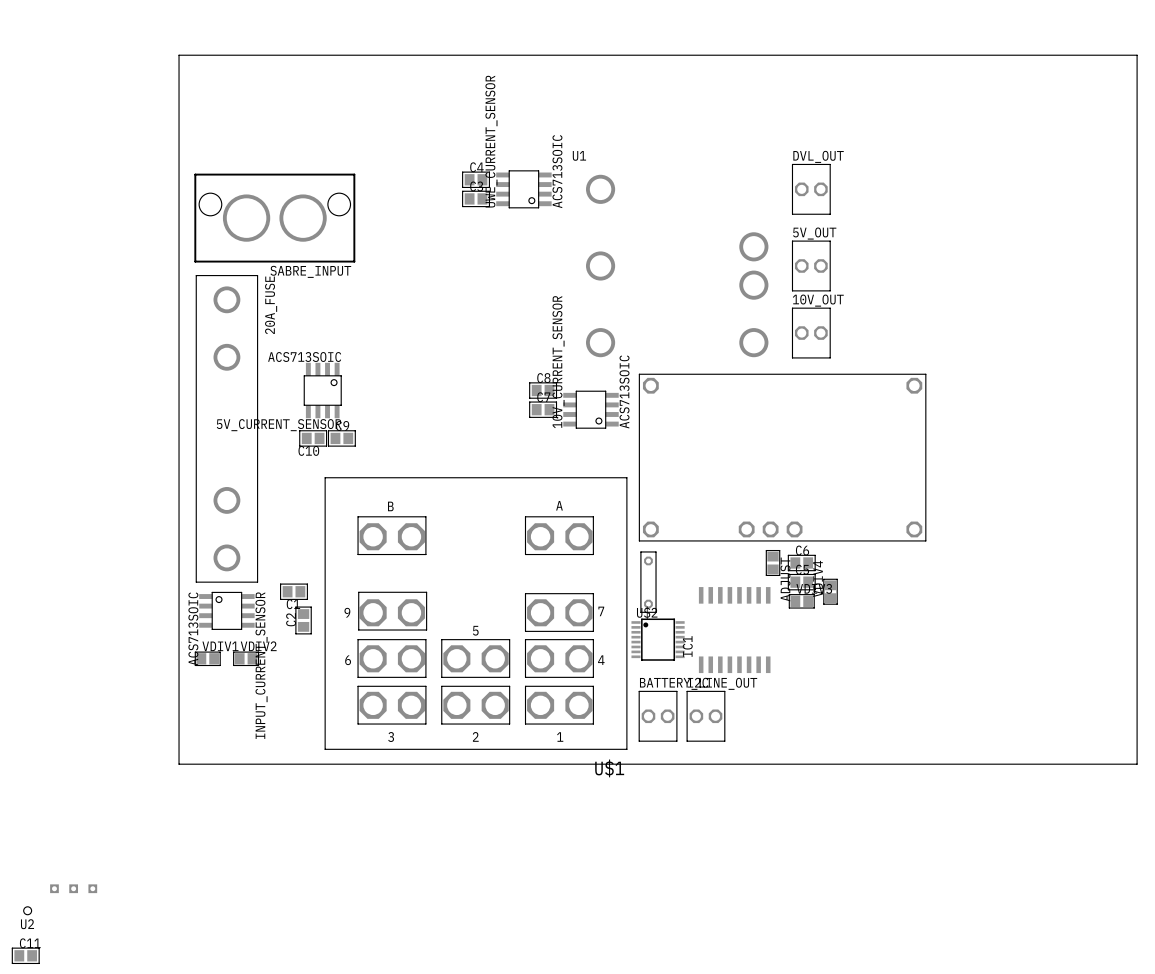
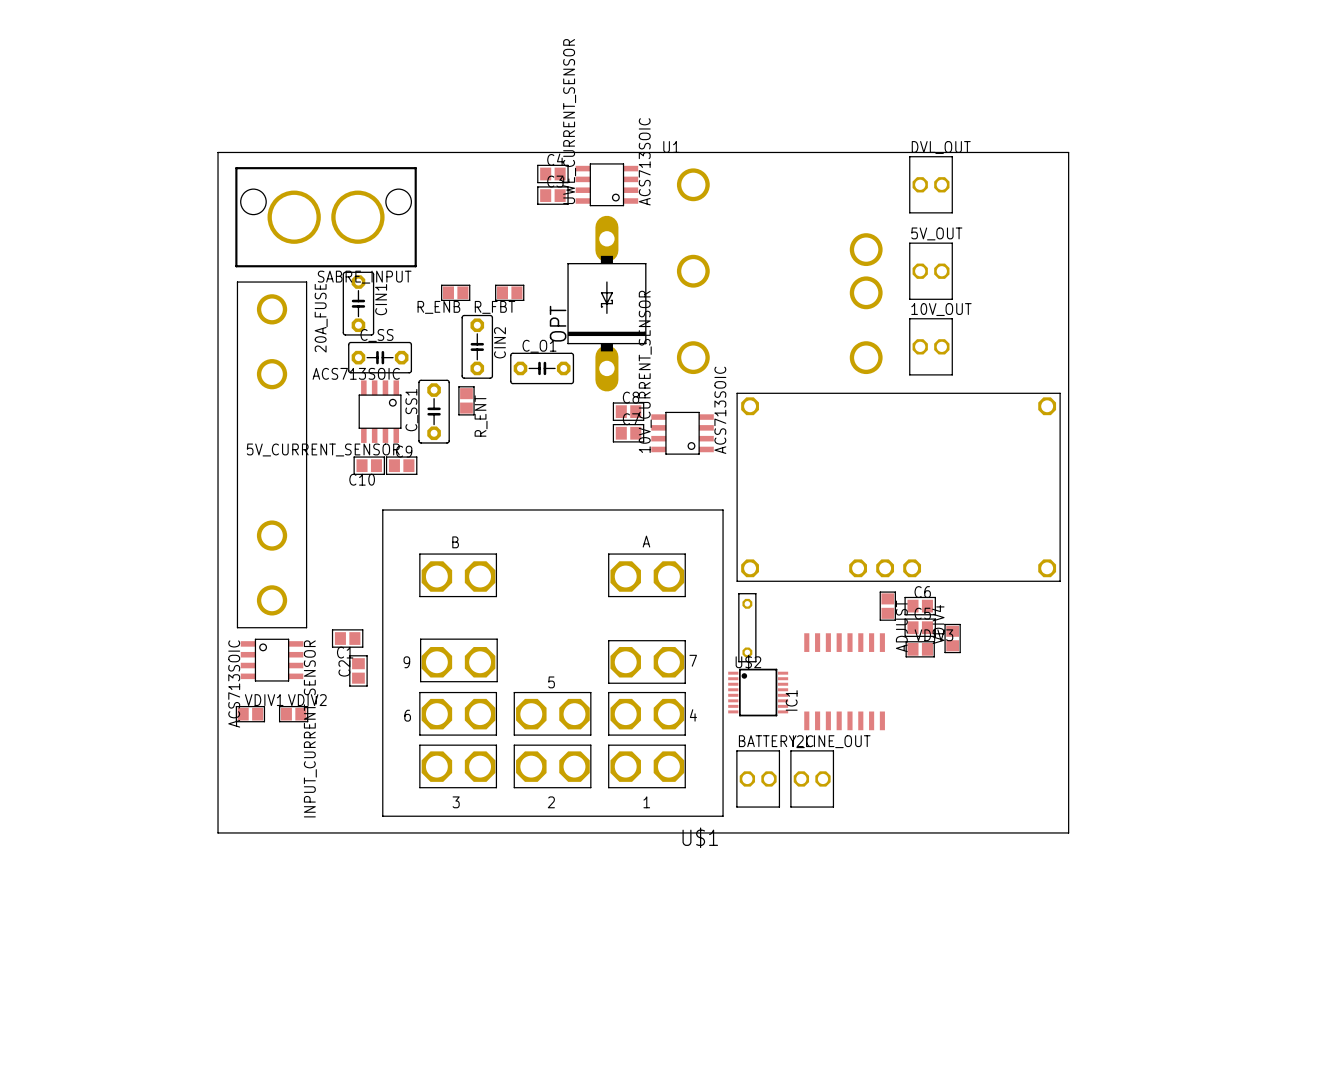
board edge: (179, 160) (179, 55) (1137, 55) (1137, 764) (933, 764) -> (218, 152) (1068, 152) (1068, 832)
R_ENB: none -> (455, 292)
R_FBT: none -> (509, 292)
CIN1: none -> (358, 303)
OPT: none -> (606, 303)
CIN2: none -> (477, 346)
C_SS: none -> (380, 357)
C_O1: none -> (542, 368)
R_ENT: none -> (466, 400)
C_SS1: none -> (434, 411)
U2: (60, 899) -> none
C11: (25, 955) -> none

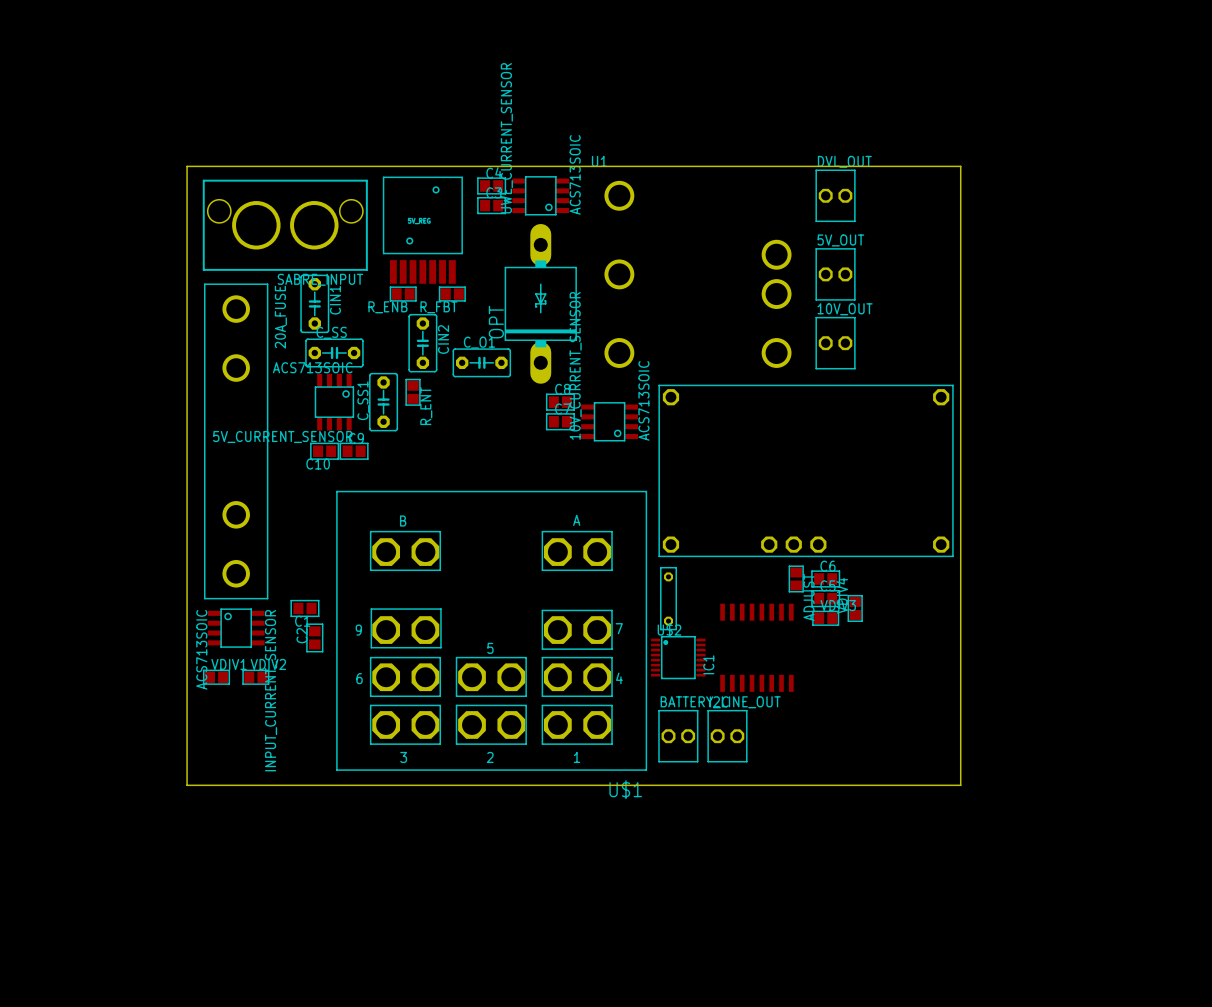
part: none -> (422, 230)

